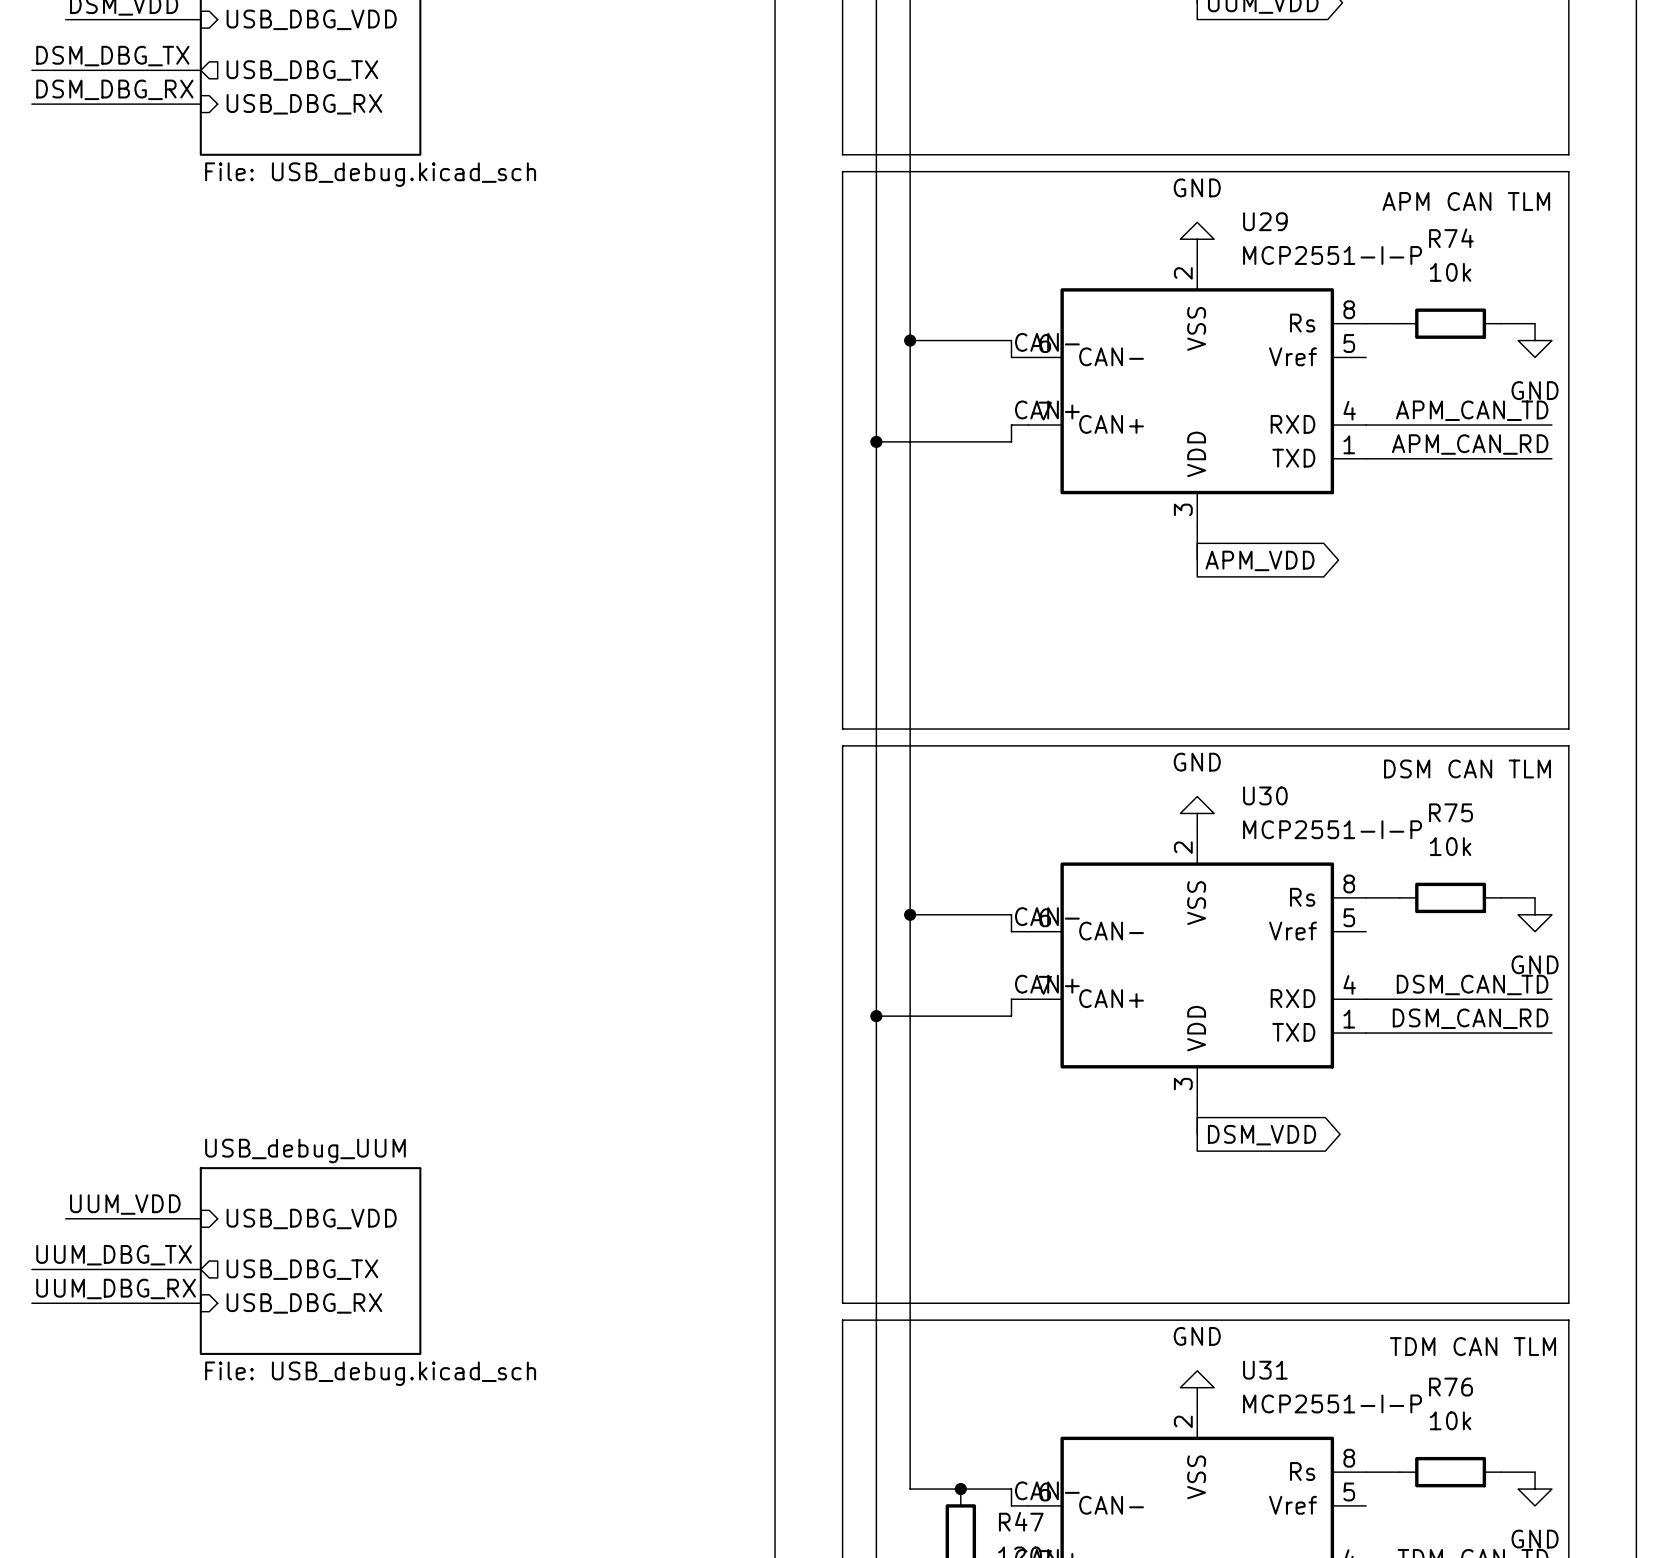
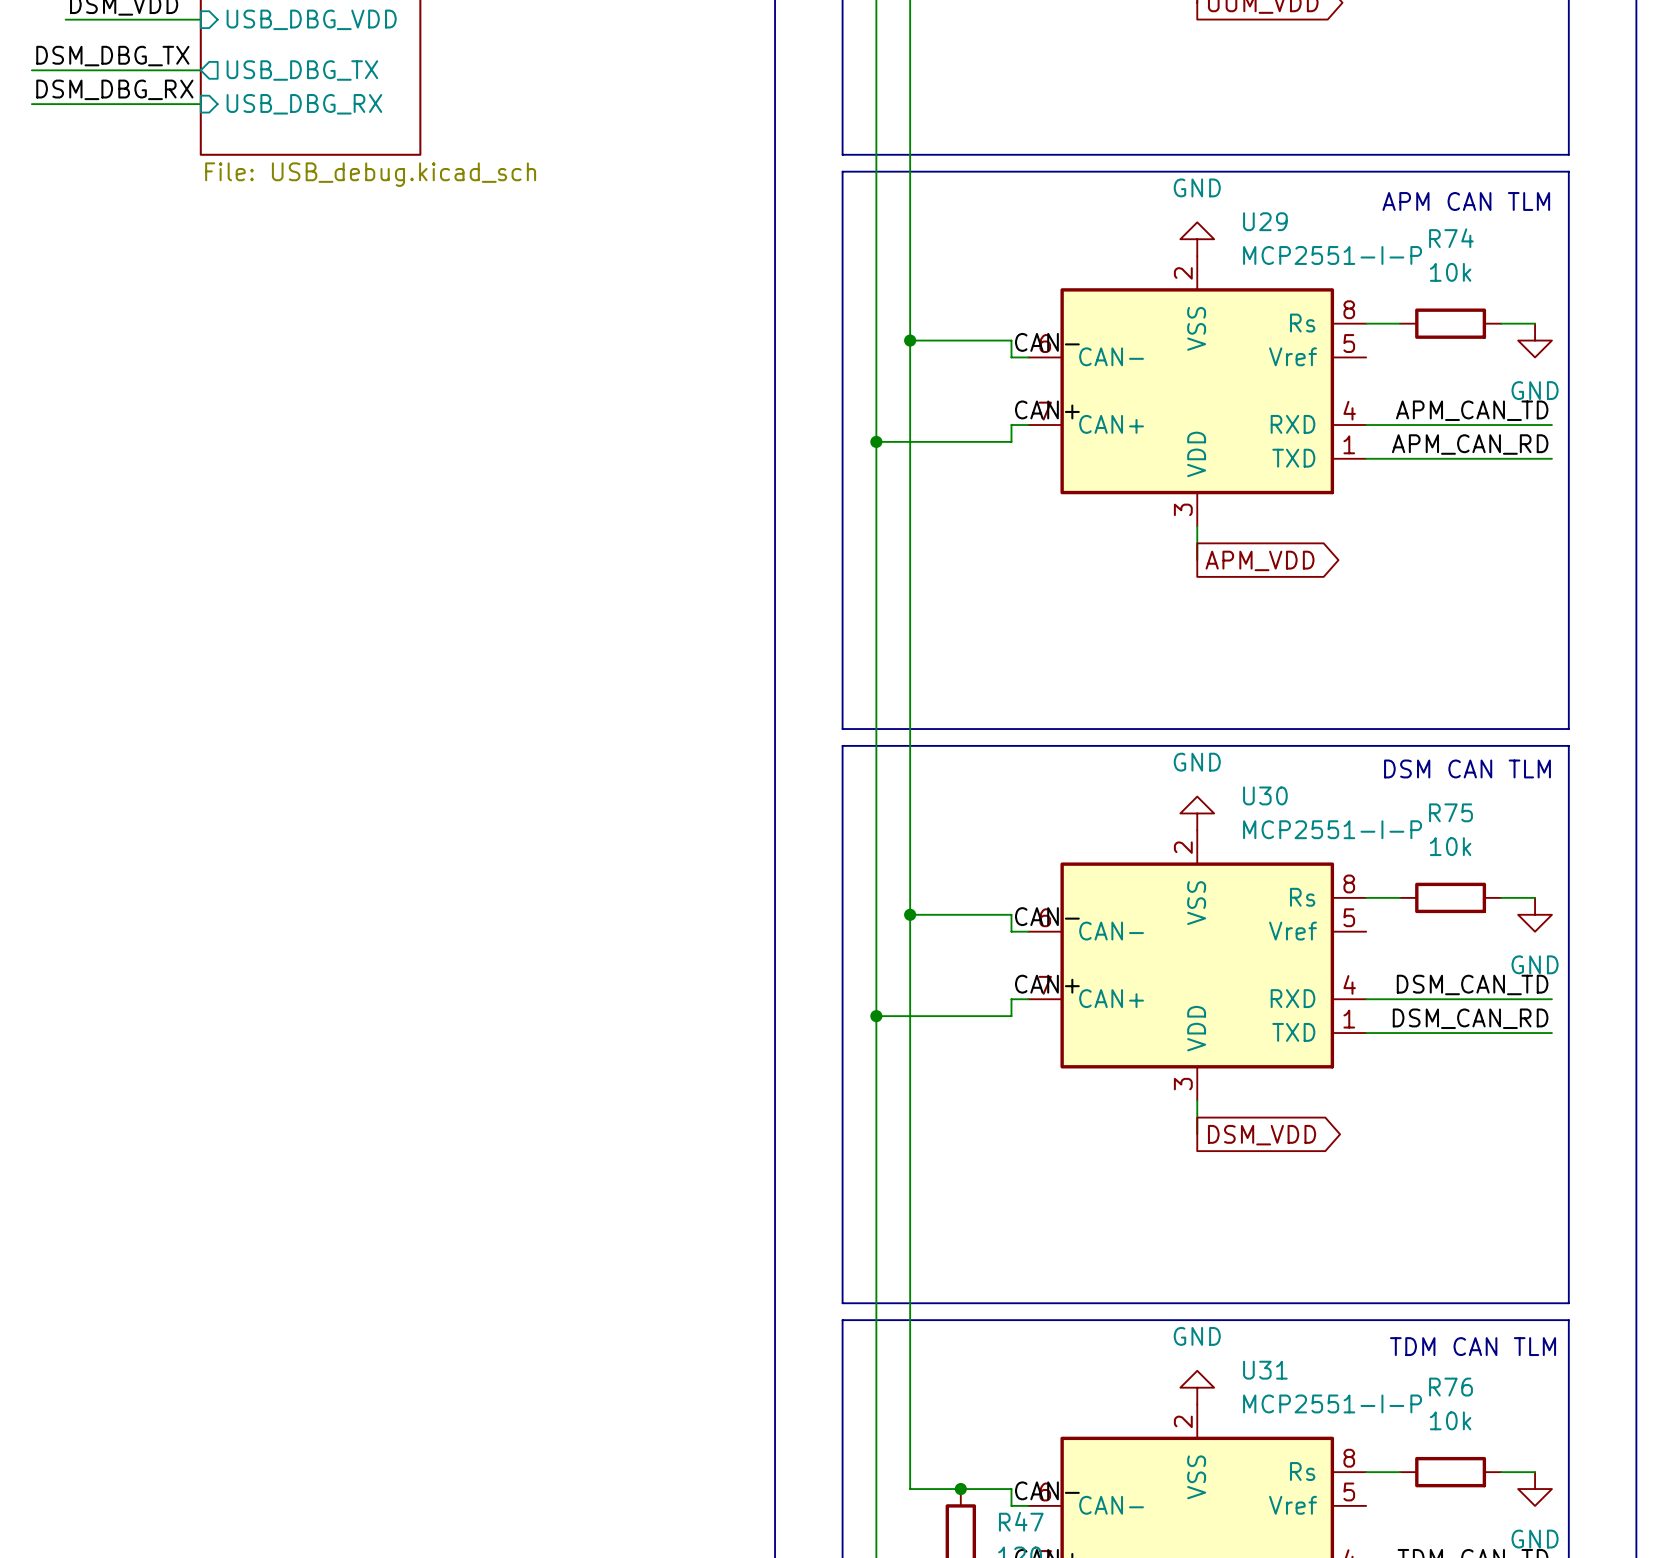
label: UUM_VDD (125, 1204) -> none
wire: (65, 1218) (200, 1218) -> none
sheet pin: USB_DBG_VDD (311, 1218) -> none
label: UUM_DBG_TX (114, 1255) -> none
sheet USB_debug_UUM: File: USB_debug.kicad_sch (310, 1261) -> none
wire: (31, 1269) (200, 1269) -> none
sheet pin: USB_DBG_TX (302, 1269) -> none
label: UUM_DBG_RX (116, 1288) -> none
wire: (31, 1303) (200, 1303) -> none
sheet pin: USB_DBG_RX (304, 1303) -> none

